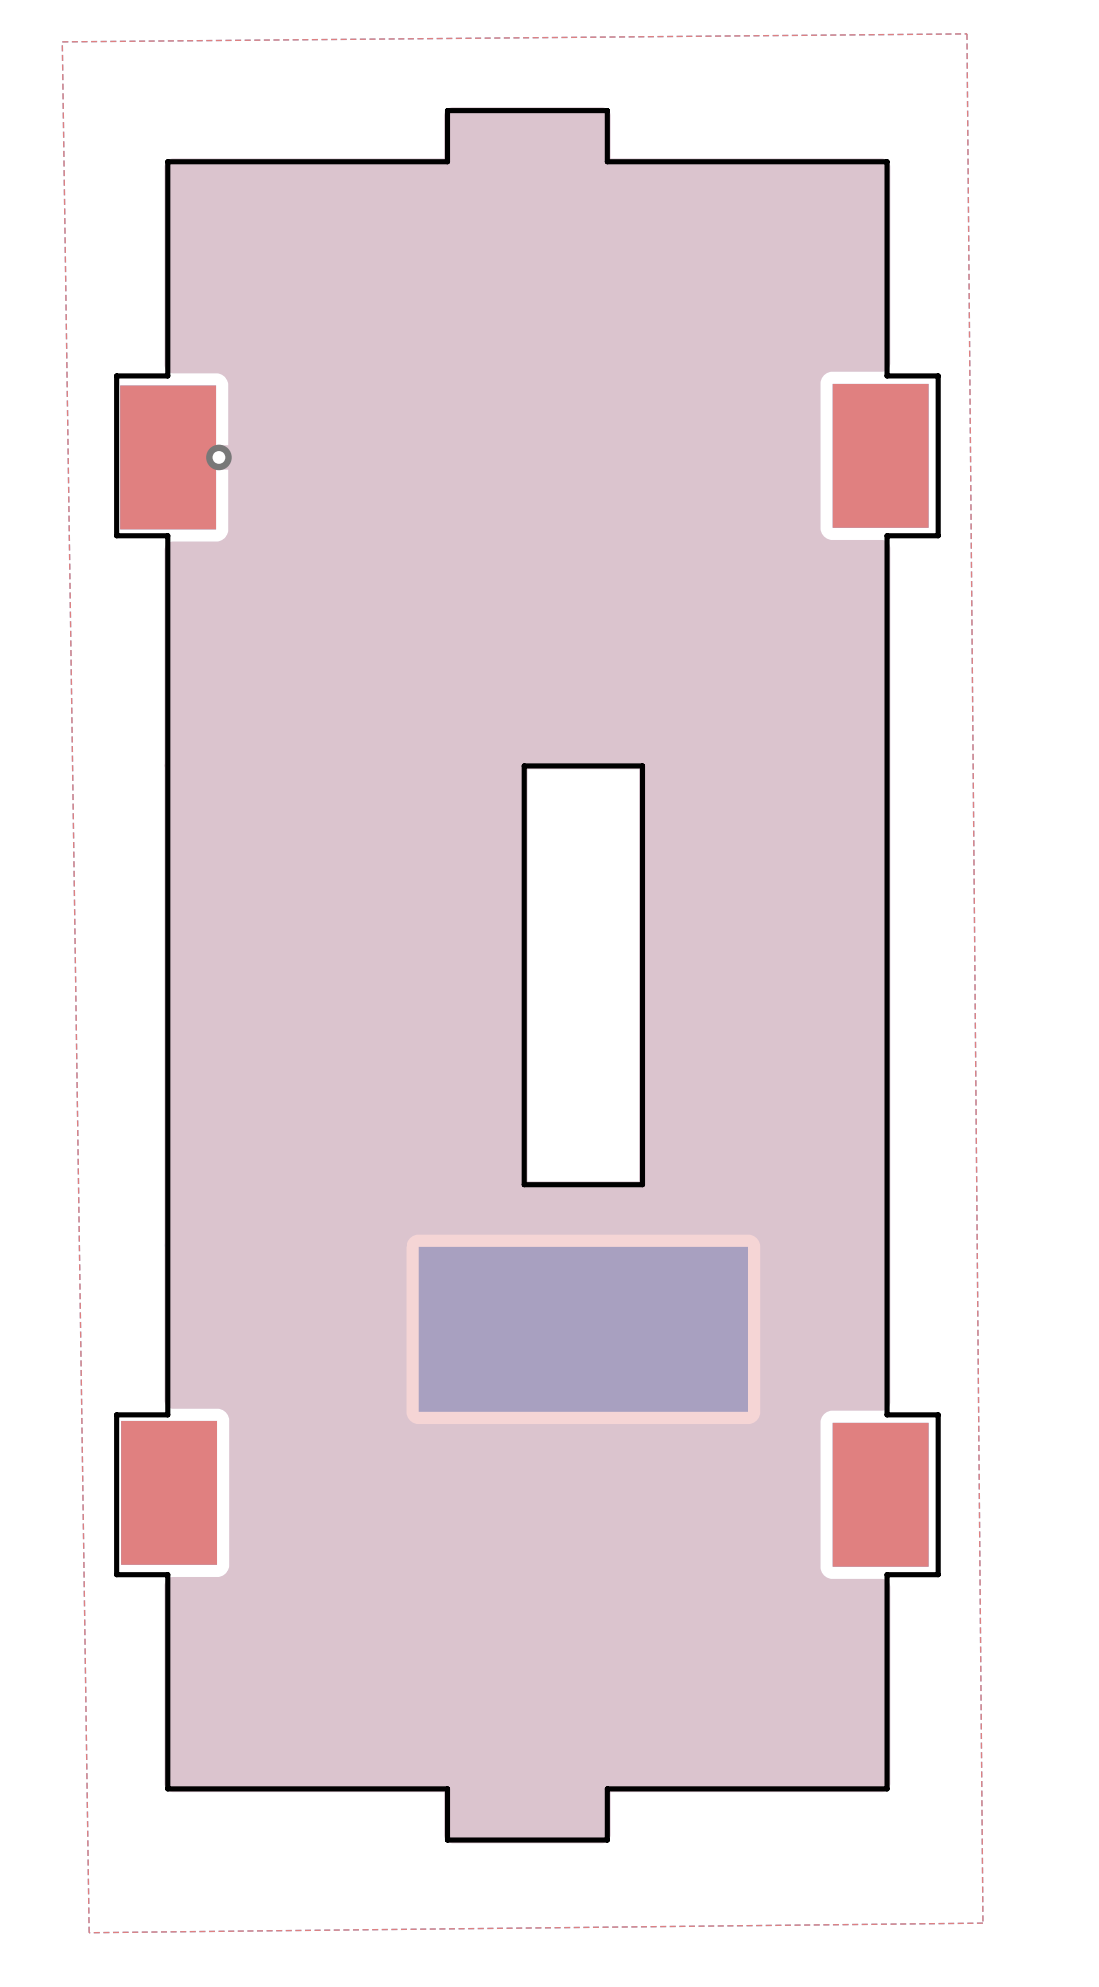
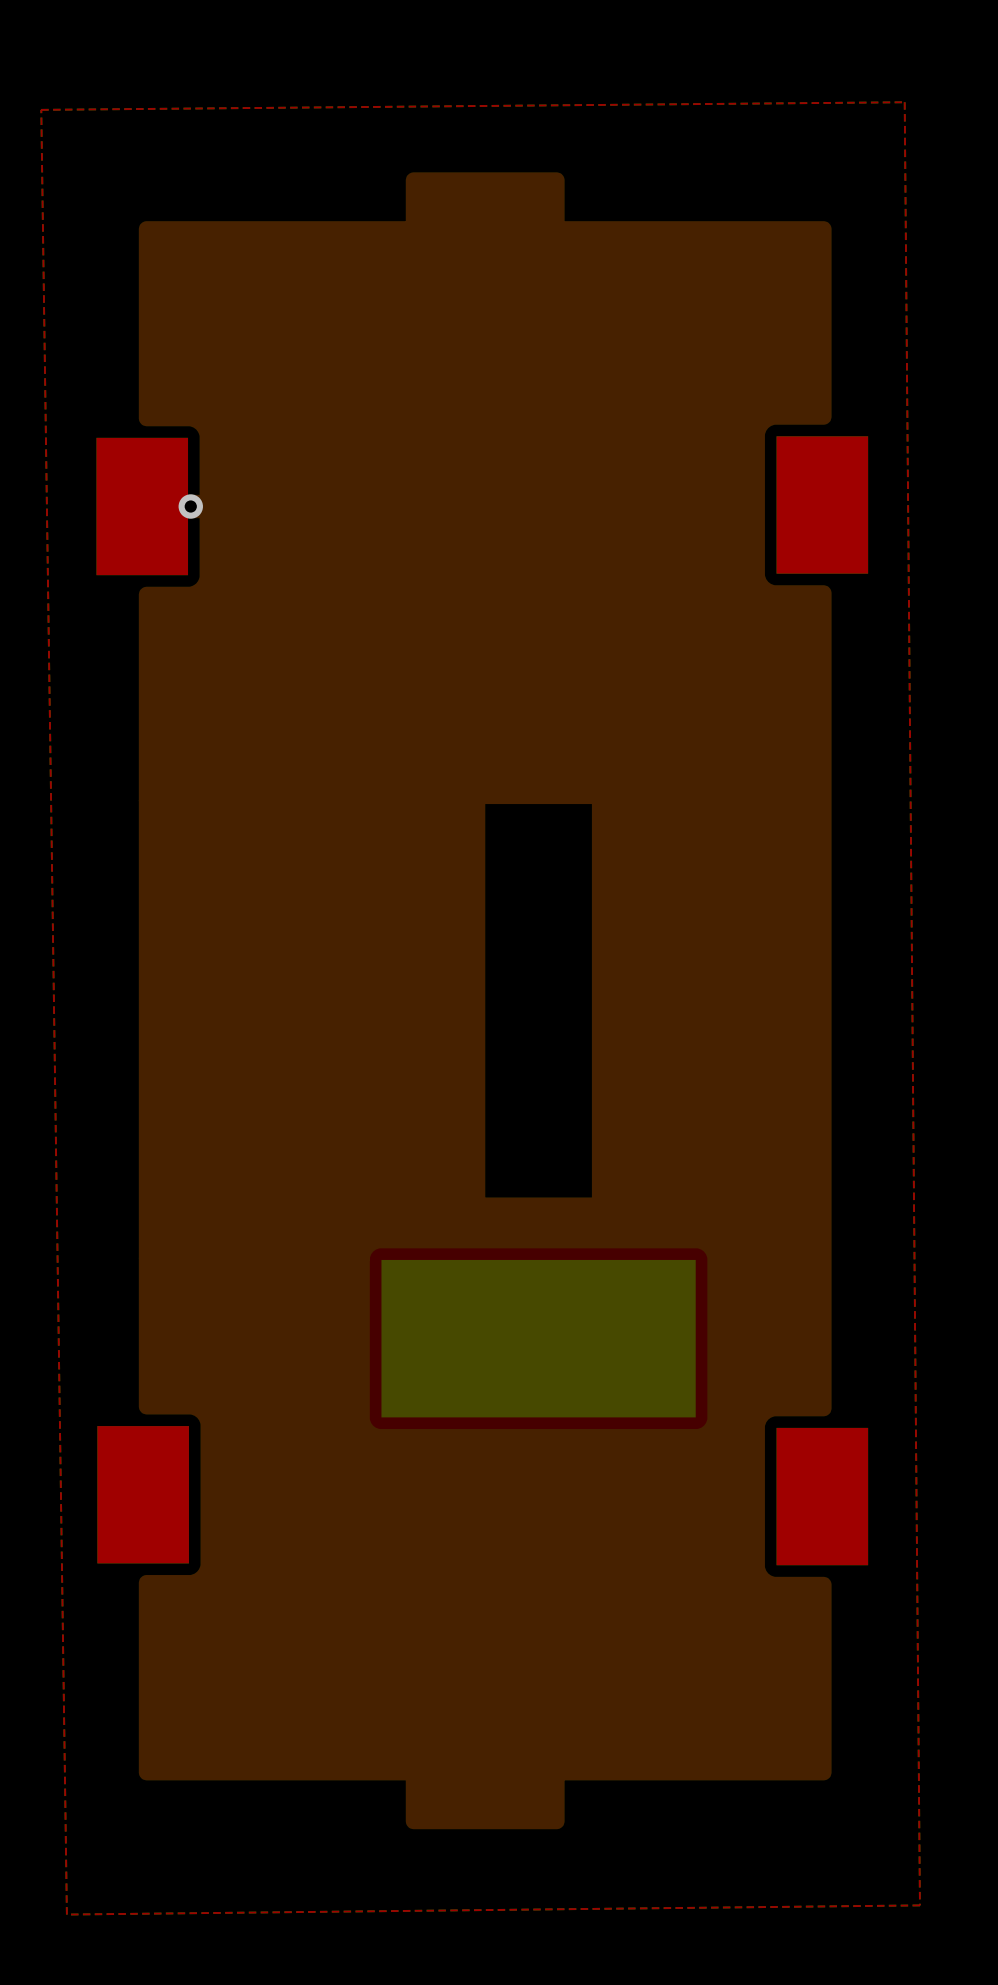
board edge: (447, 110) (607, 110) (607, 161) (887, 161) (887, 375) (938, 375) (938, 535) (887, 535) (887, 1414) (938, 1414) (938, 1574) (887, 1574) (887, 1788) (607, 1788) (607, 1840) (447, 1840) (447, 1788) (167, 1788) (167, 1574) (116, 1574) (116, 1414) (167, 1414) (167, 535) (116, 535) (116, 375) (167, 375) (167, 161) (447, 161) (447, 110) -> none
board edge: (524, 765) (524, 1184) (642, 1184) (642, 765) (524, 765) -> none

